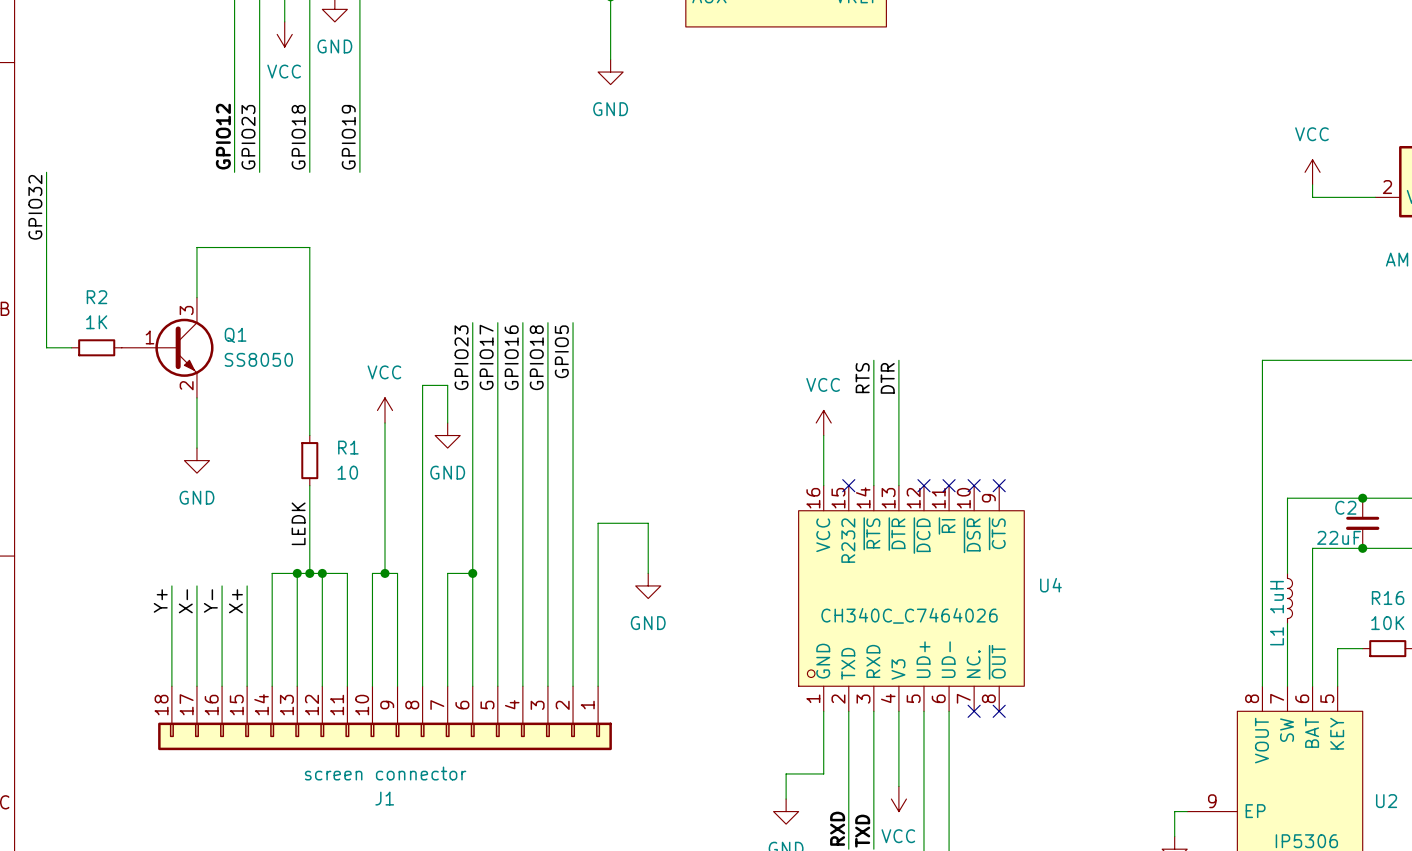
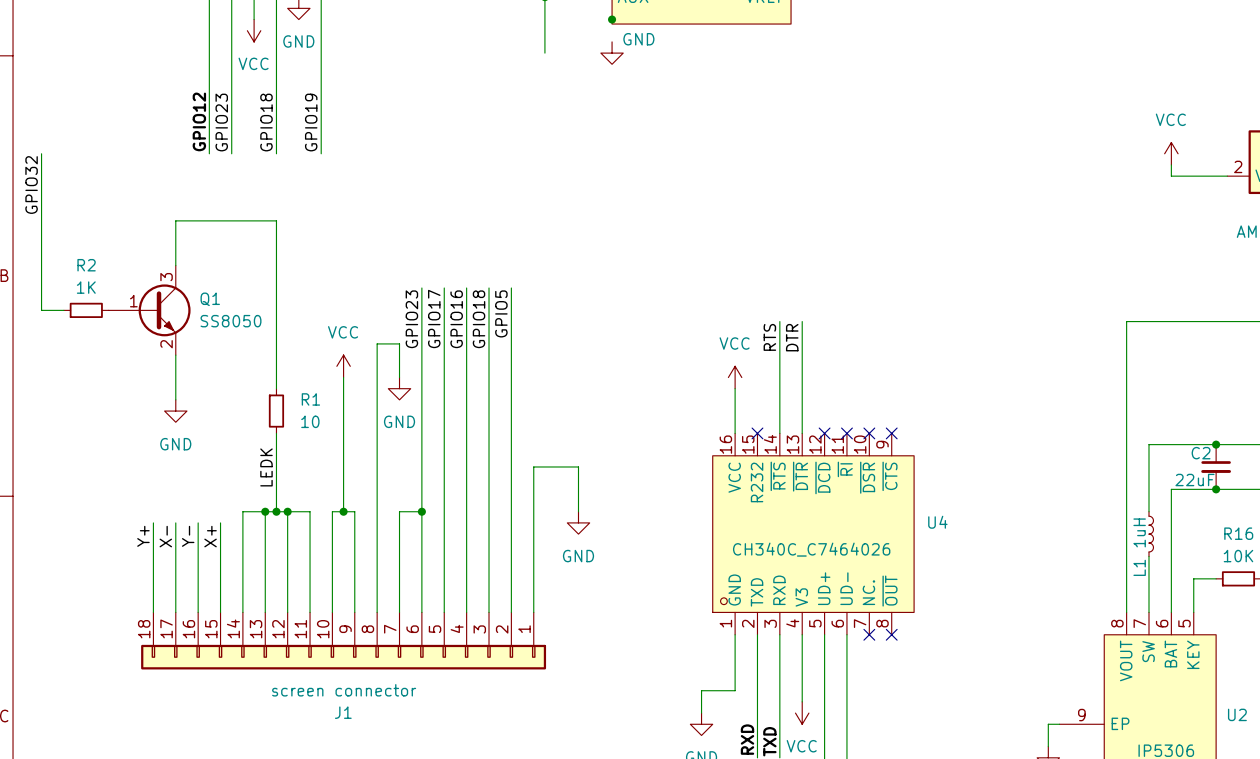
junction: none -> (612, 19)
power symbol position: GND (610, 72) -> GND (612, 53)
power symbol text position: GND (610, 109) -> GND (638, 39)

